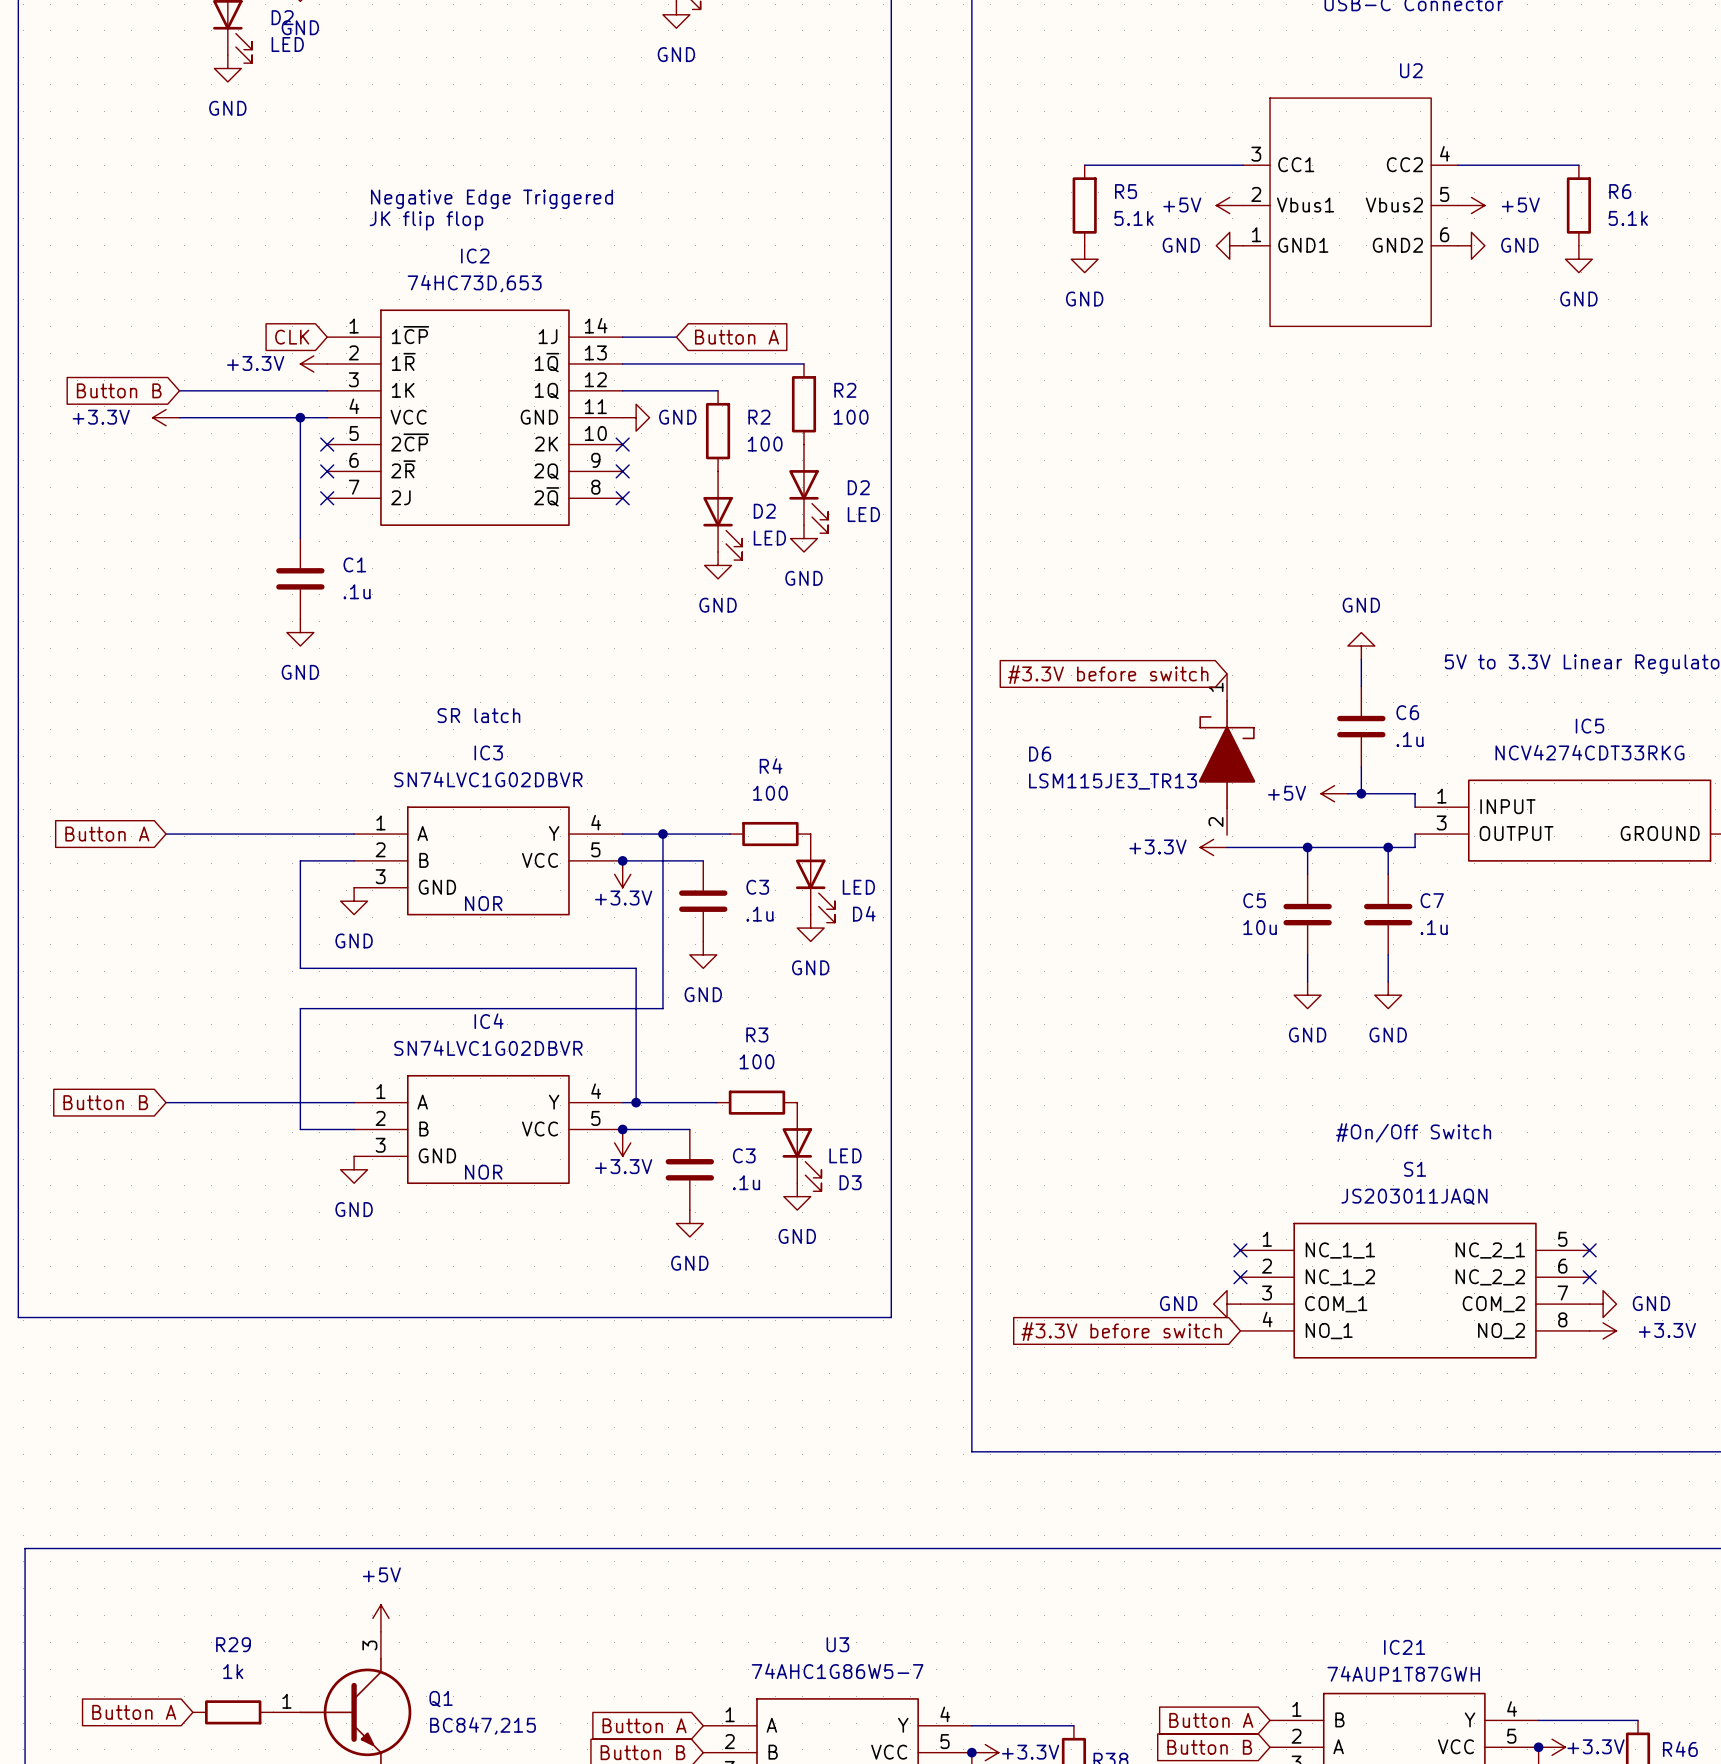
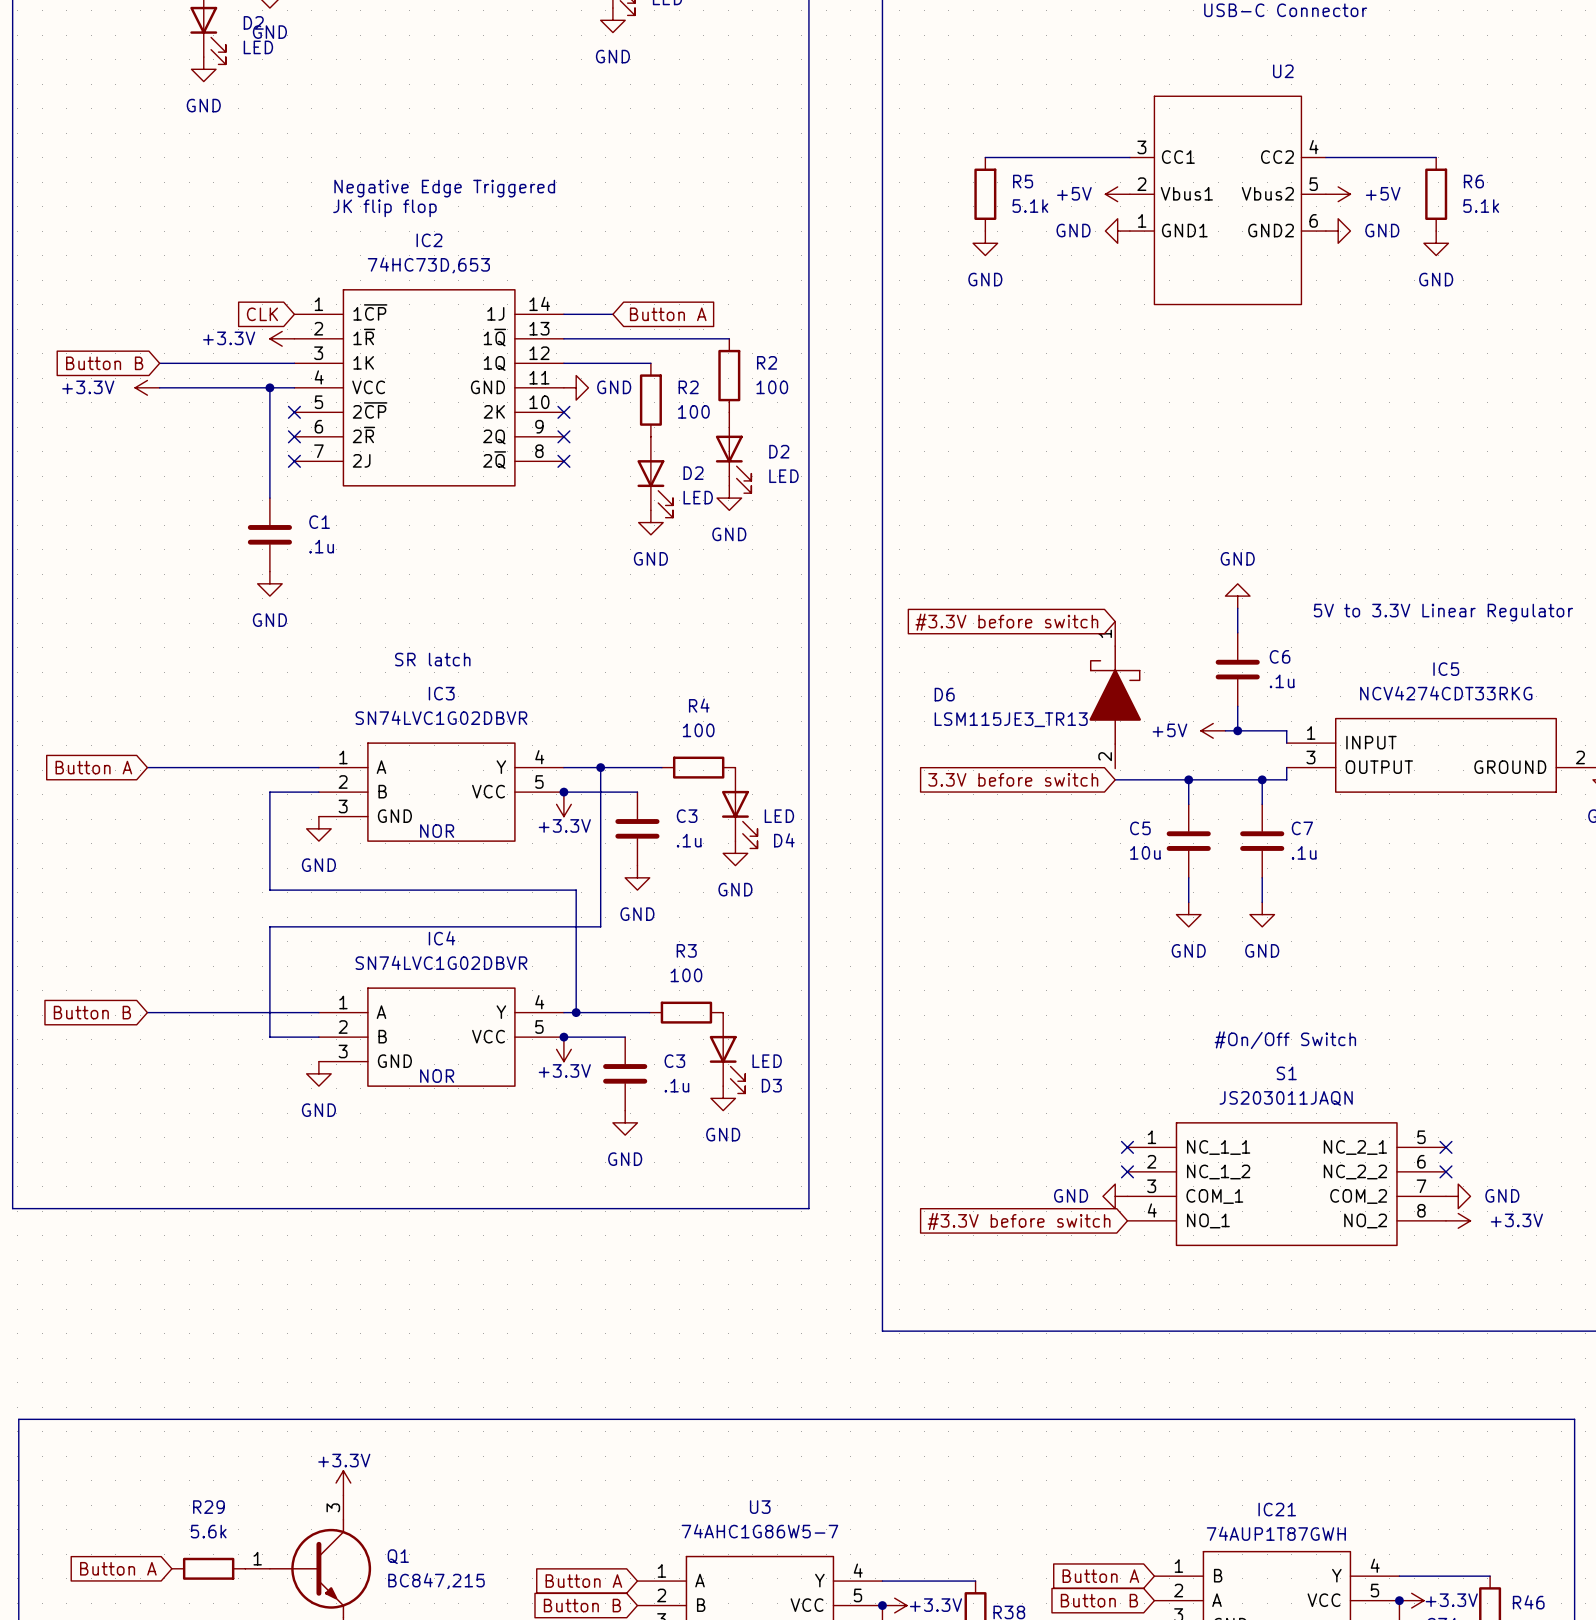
global label: none -> 3.3V before switch (1013, 779)
power symbol: +3.3V (1213, 847) -> none
power symbol: +5V (380, 1618) -> +3.3V (343, 1483)
R29 value: 1k (233, 1671) -> 5.6k (208, 1531)

